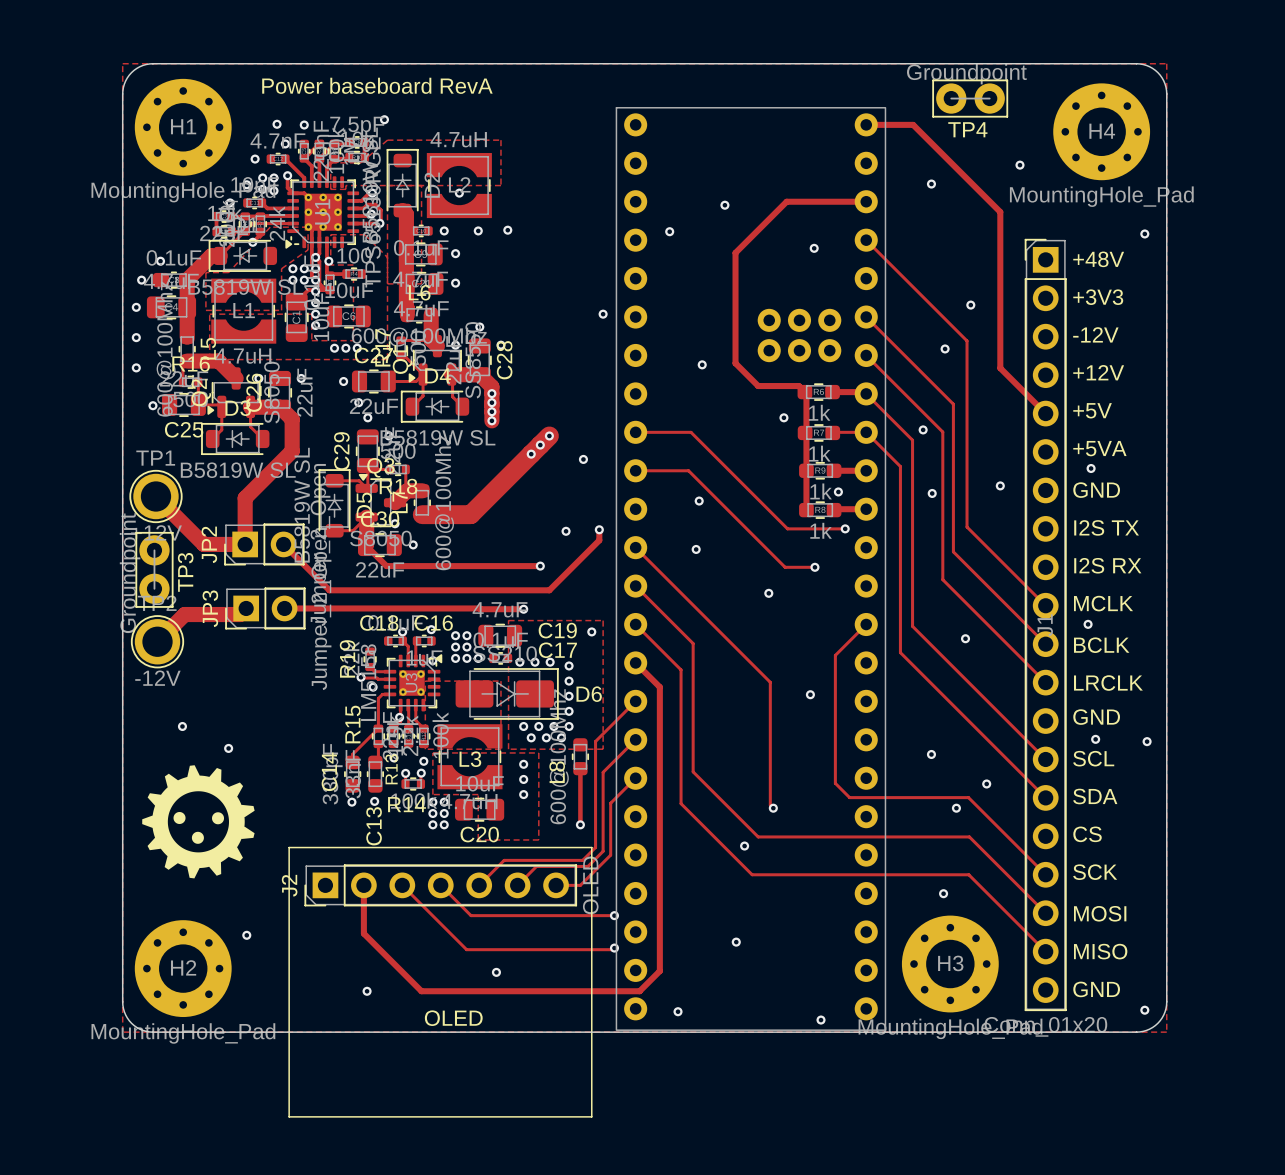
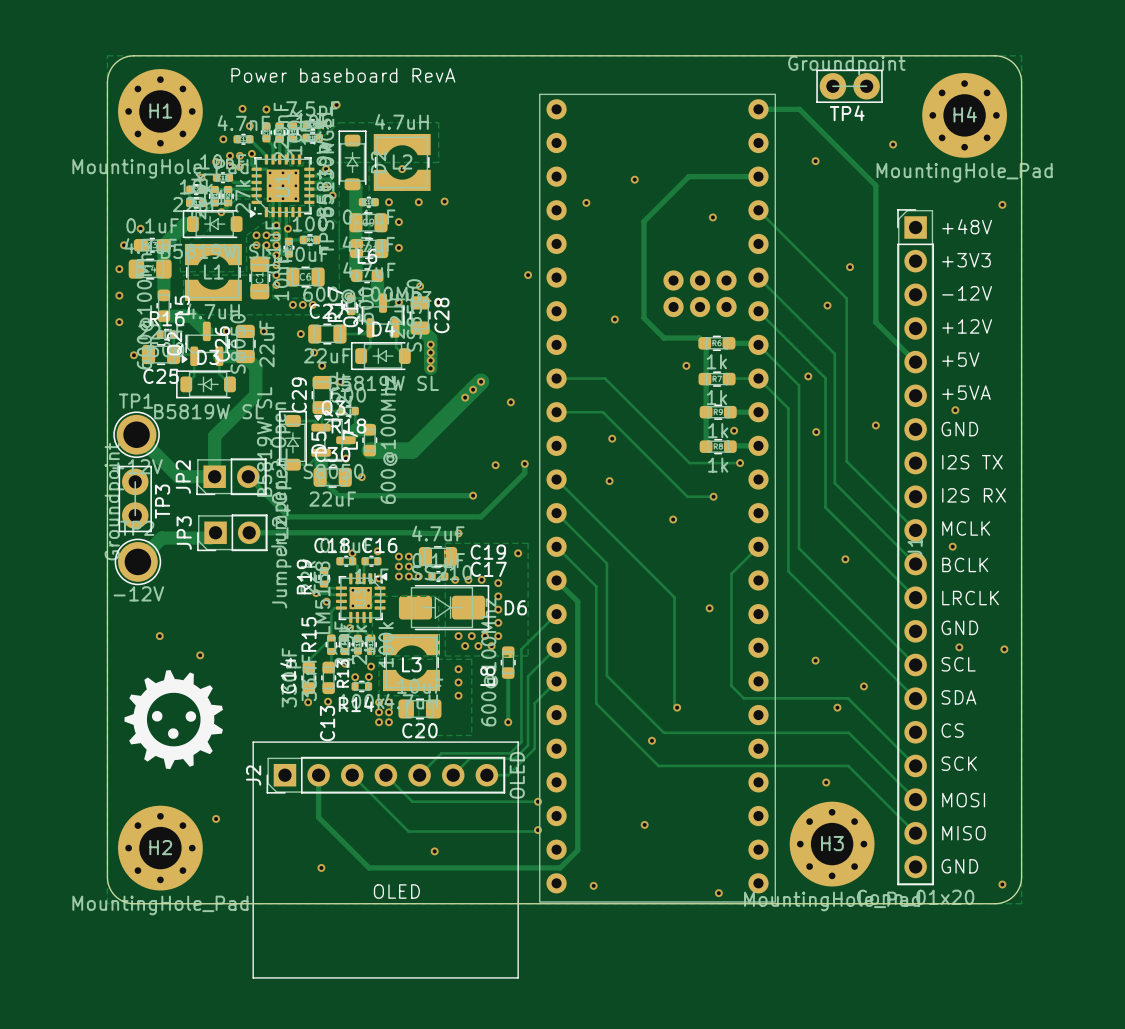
part value: 24k (277, 223) -> 27k (243, 196)

